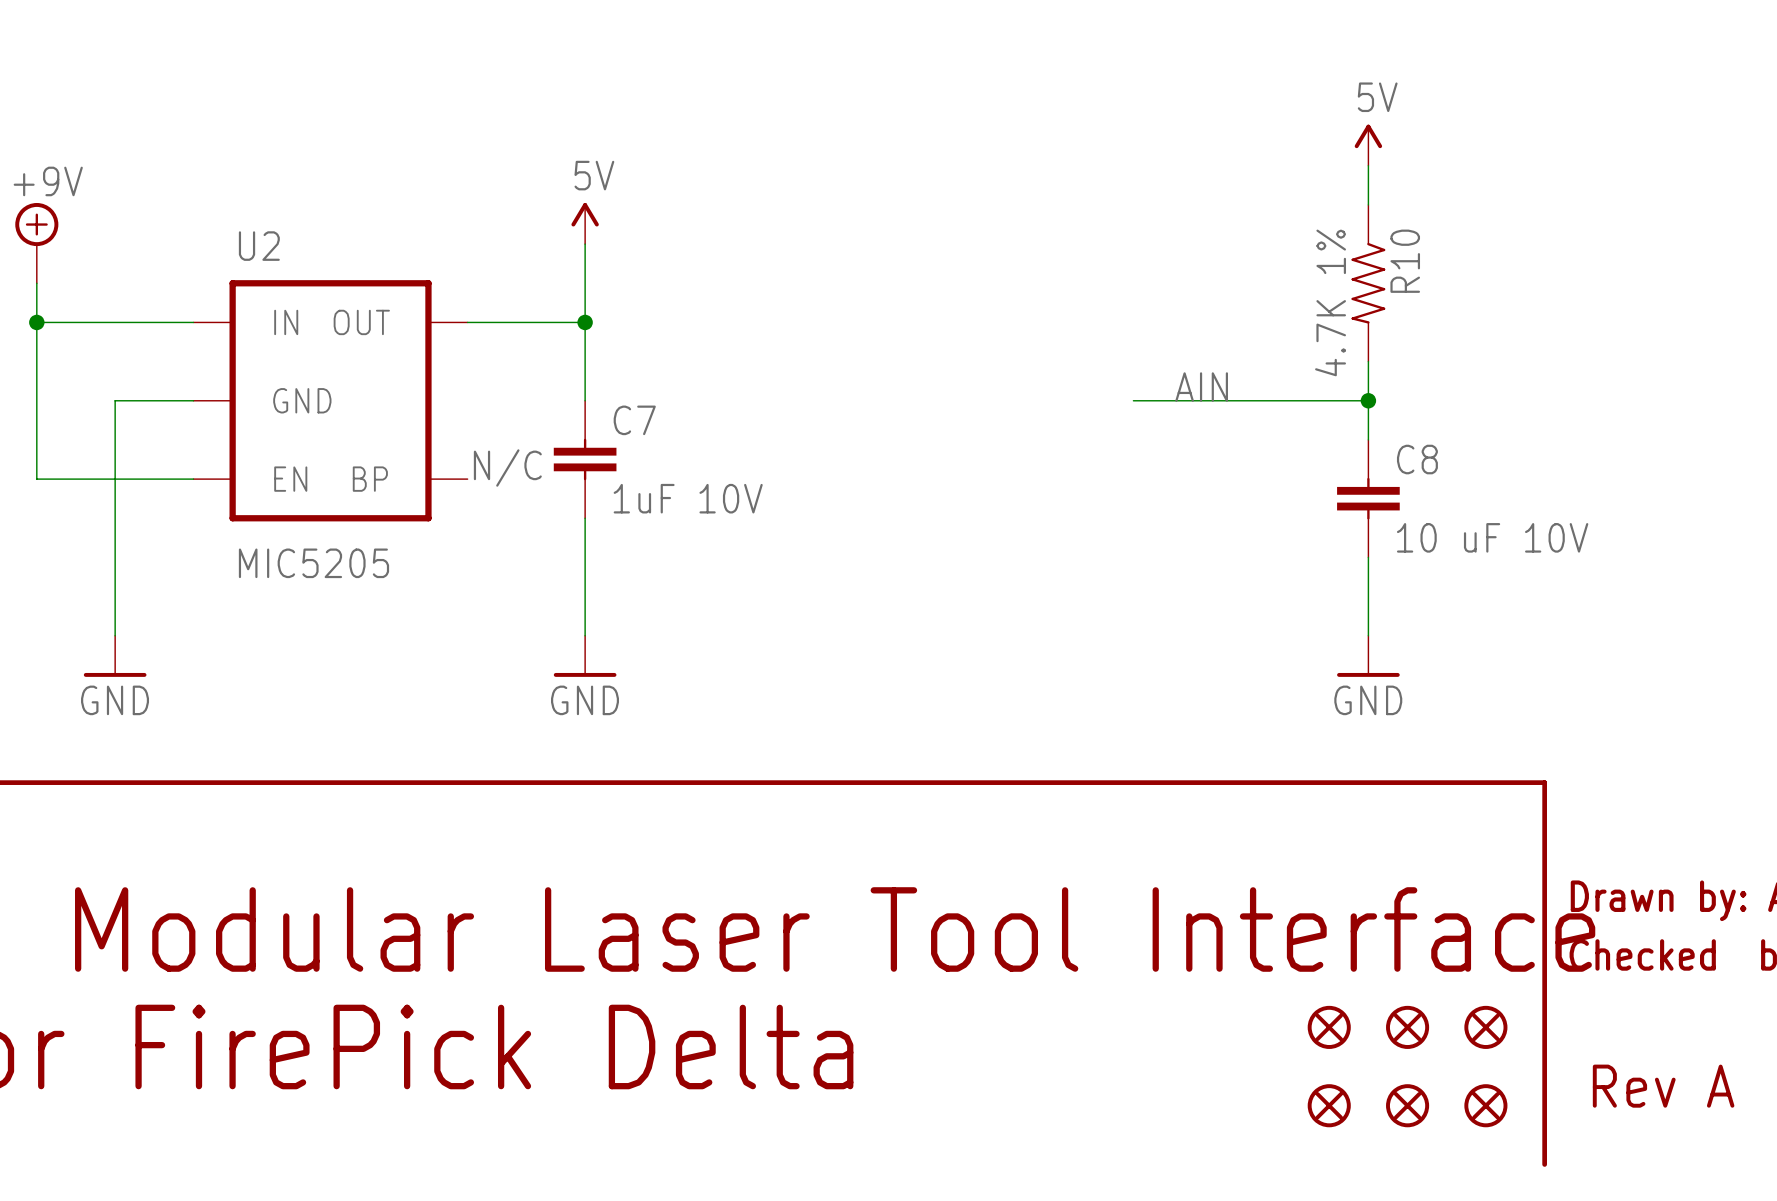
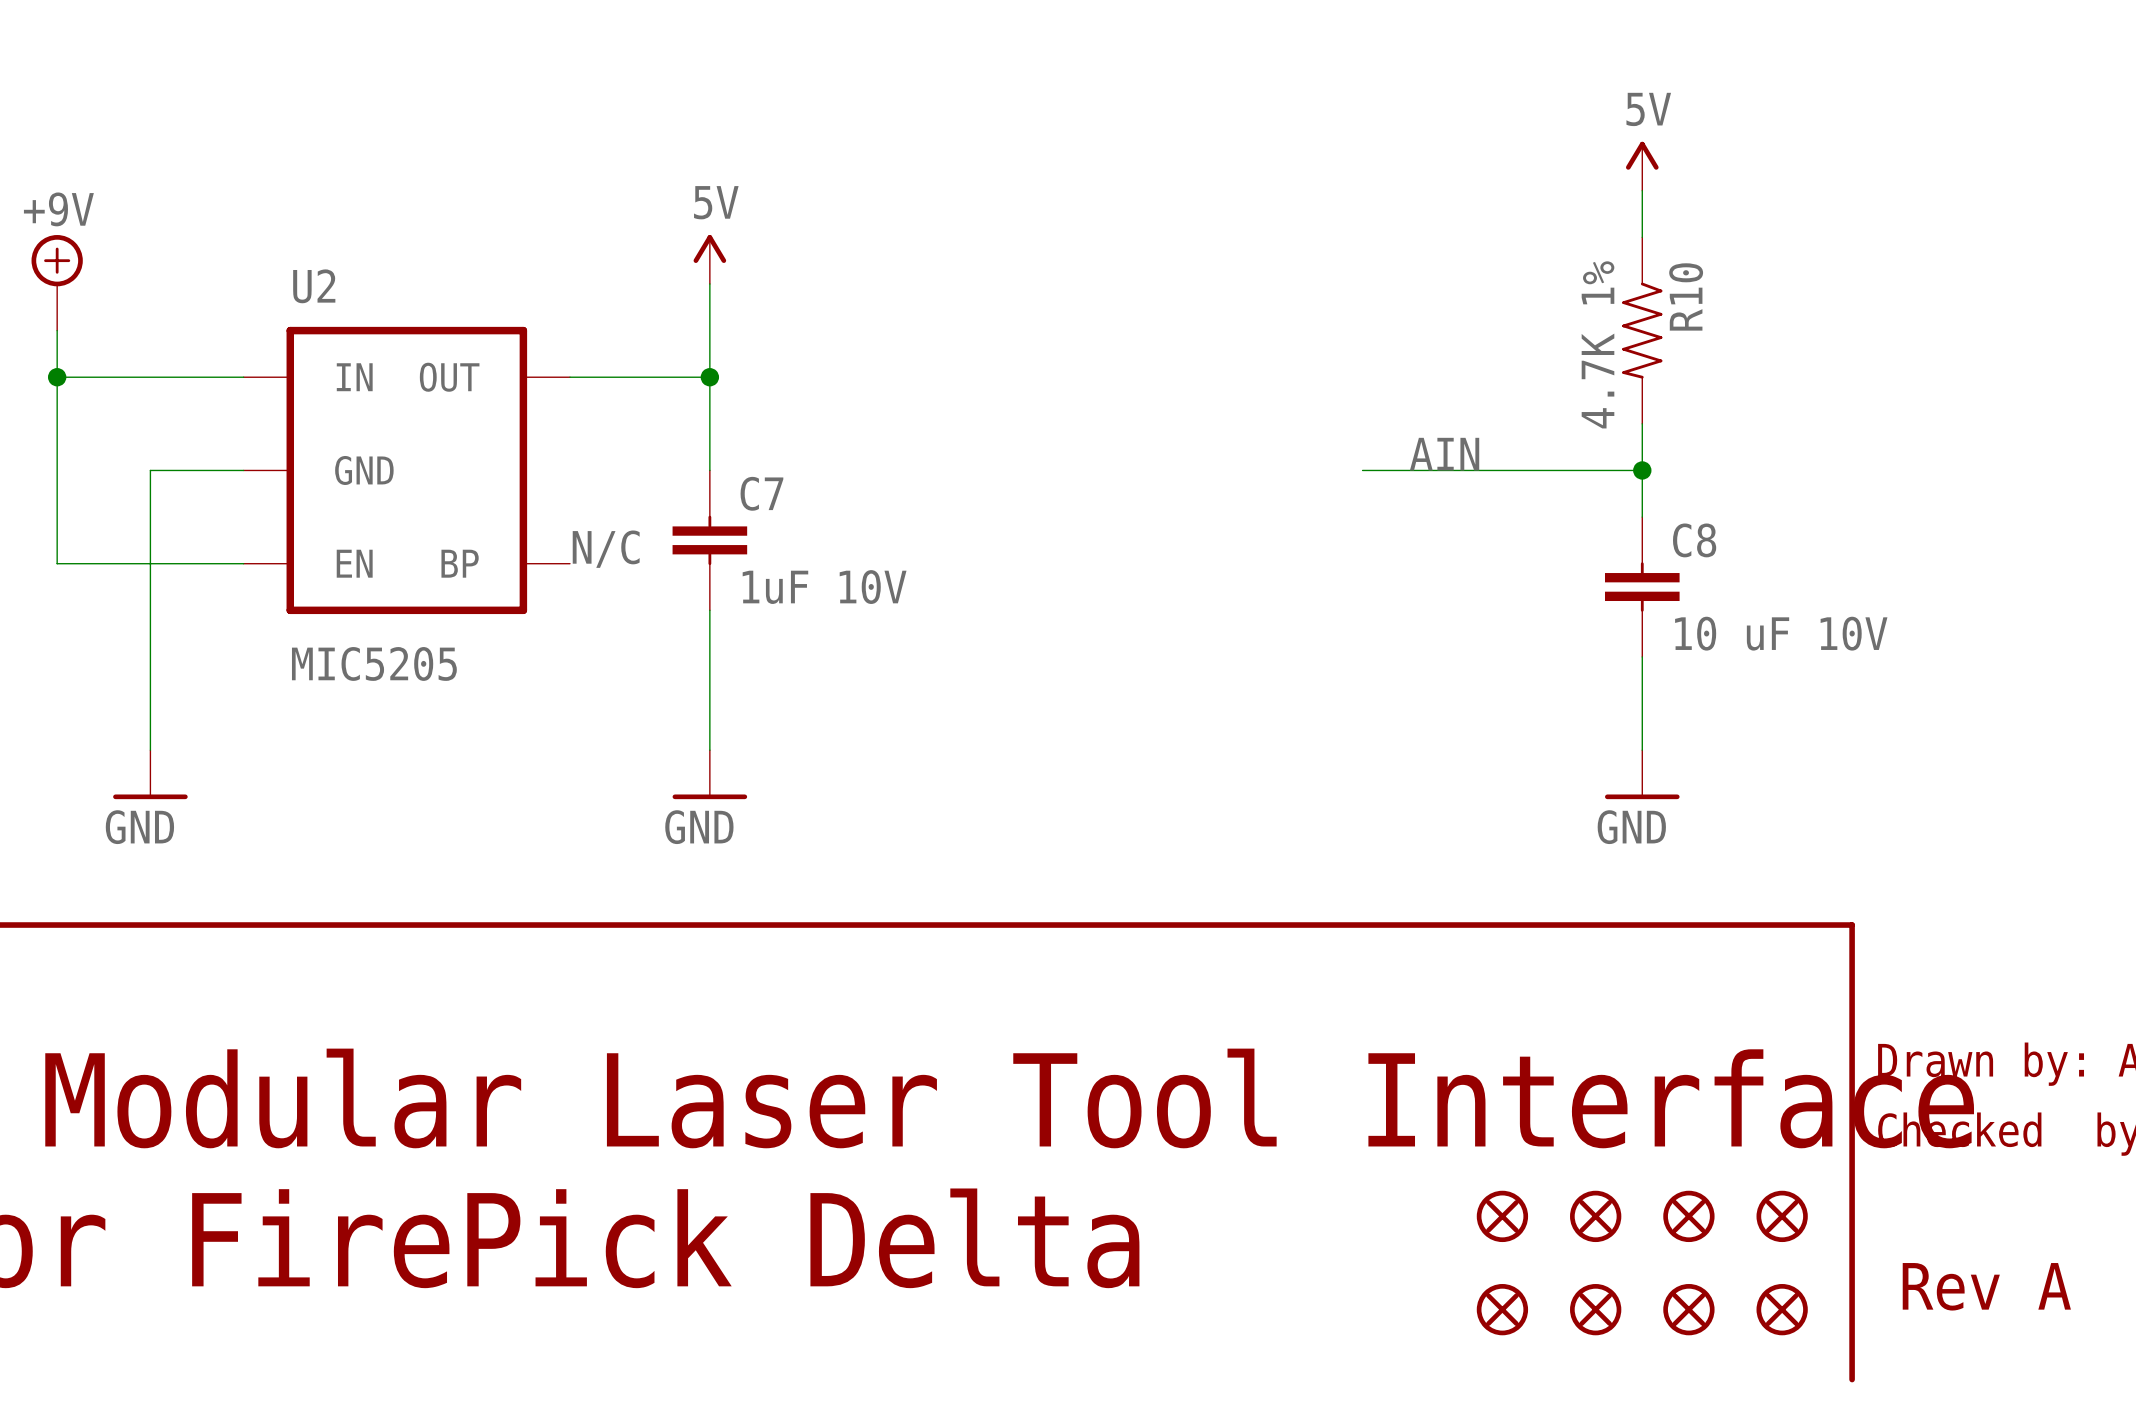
part: none -> (1502, 1216)
part: none -> (1502, 1309)

